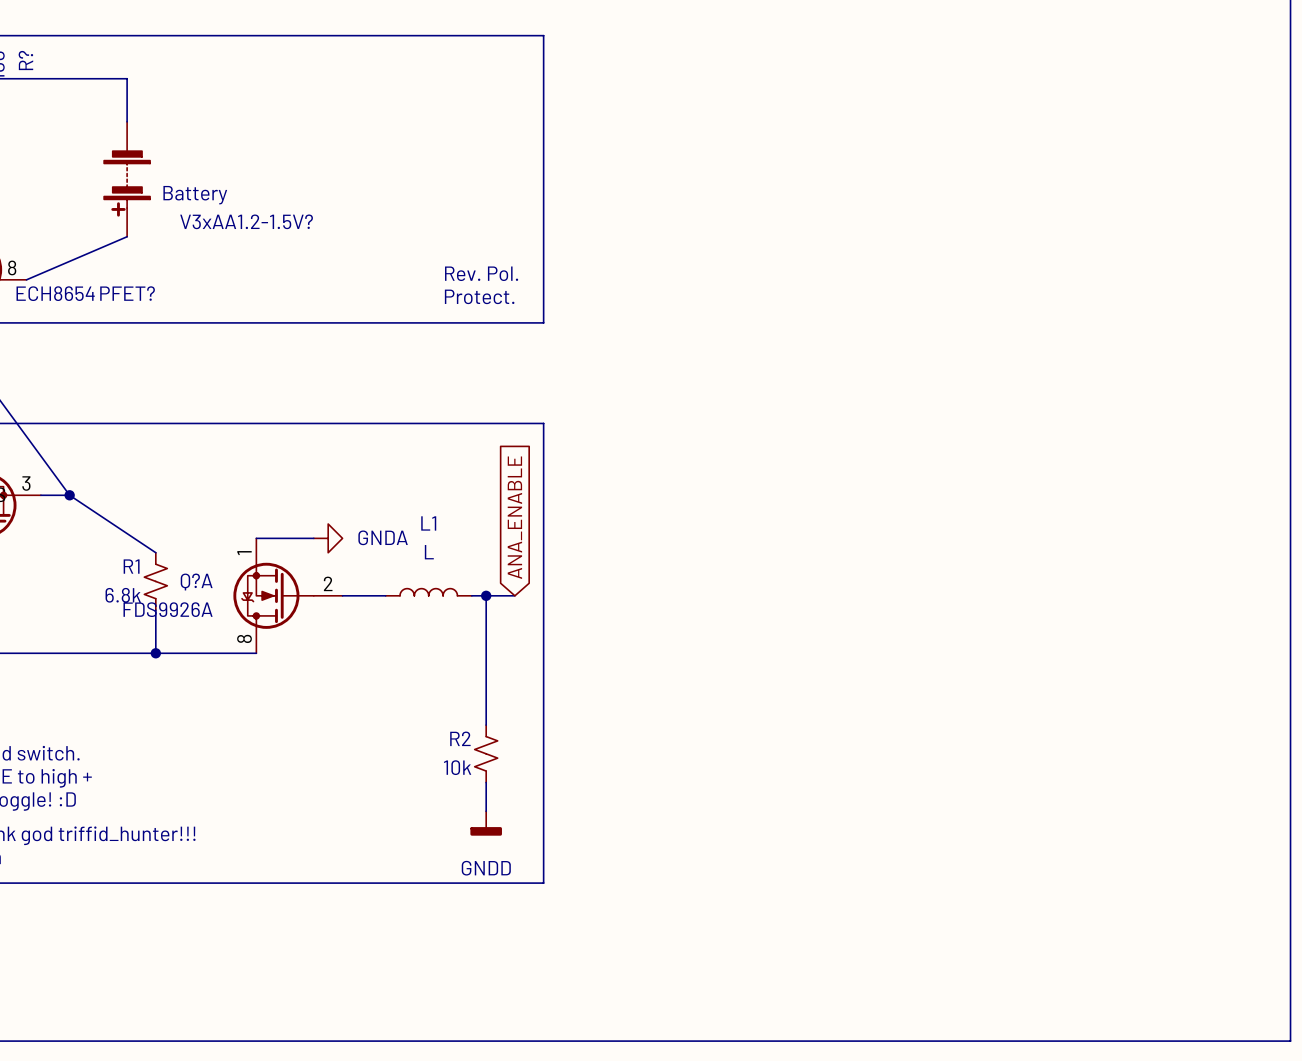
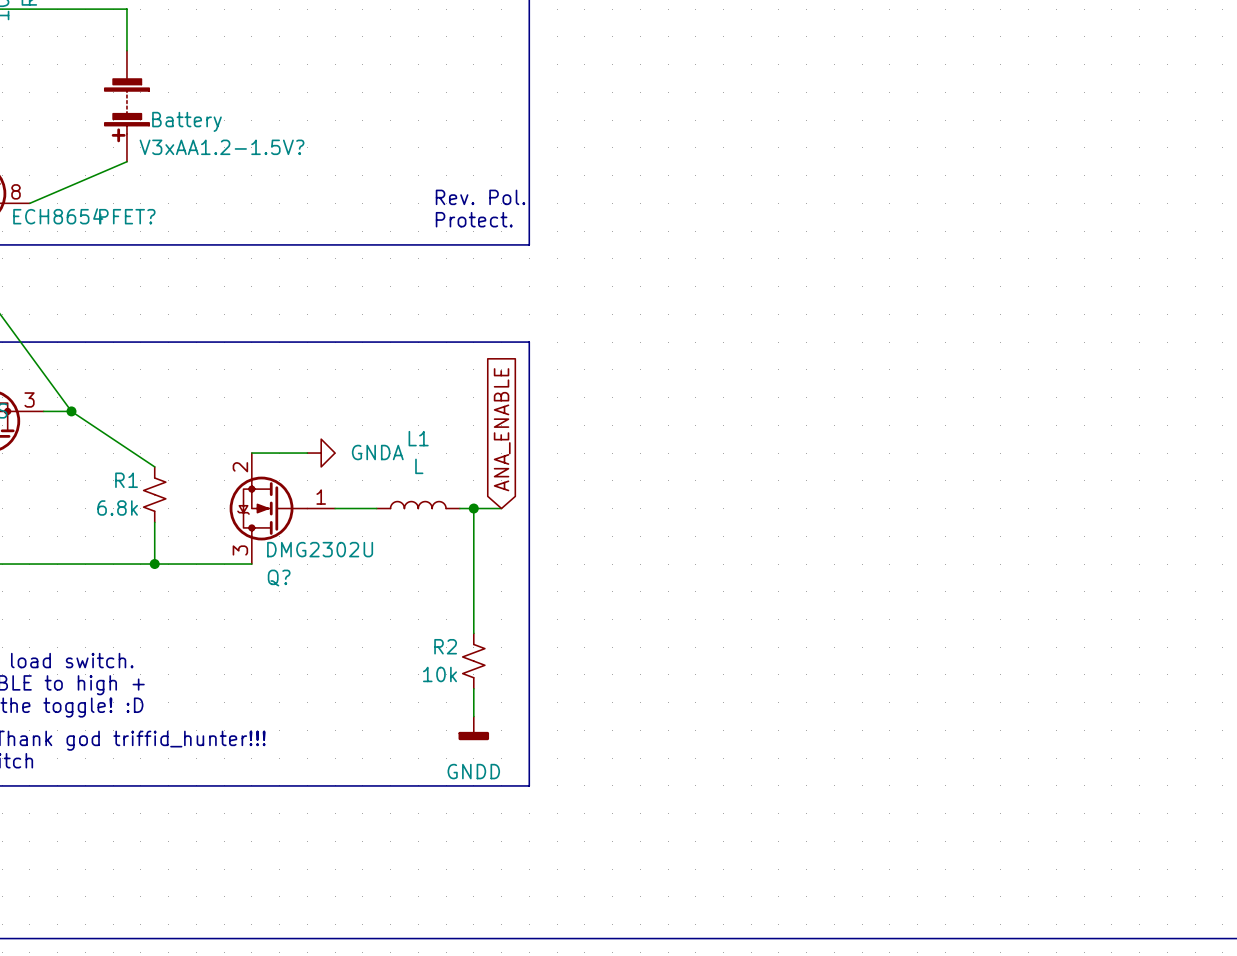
Q?A pin number: 1 (244, 553) -> 2 (240, 467)
Q?A name: Q?A (196, 582) -> Q? (279, 578)
Q?A pin number: 2 (328, 583) -> 1 (321, 497)
Q?A value: FDS9926A (168, 609) -> DMG2302U (320, 549)
Q?A pin number: 8 (244, 638) -> 3 (240, 550)

